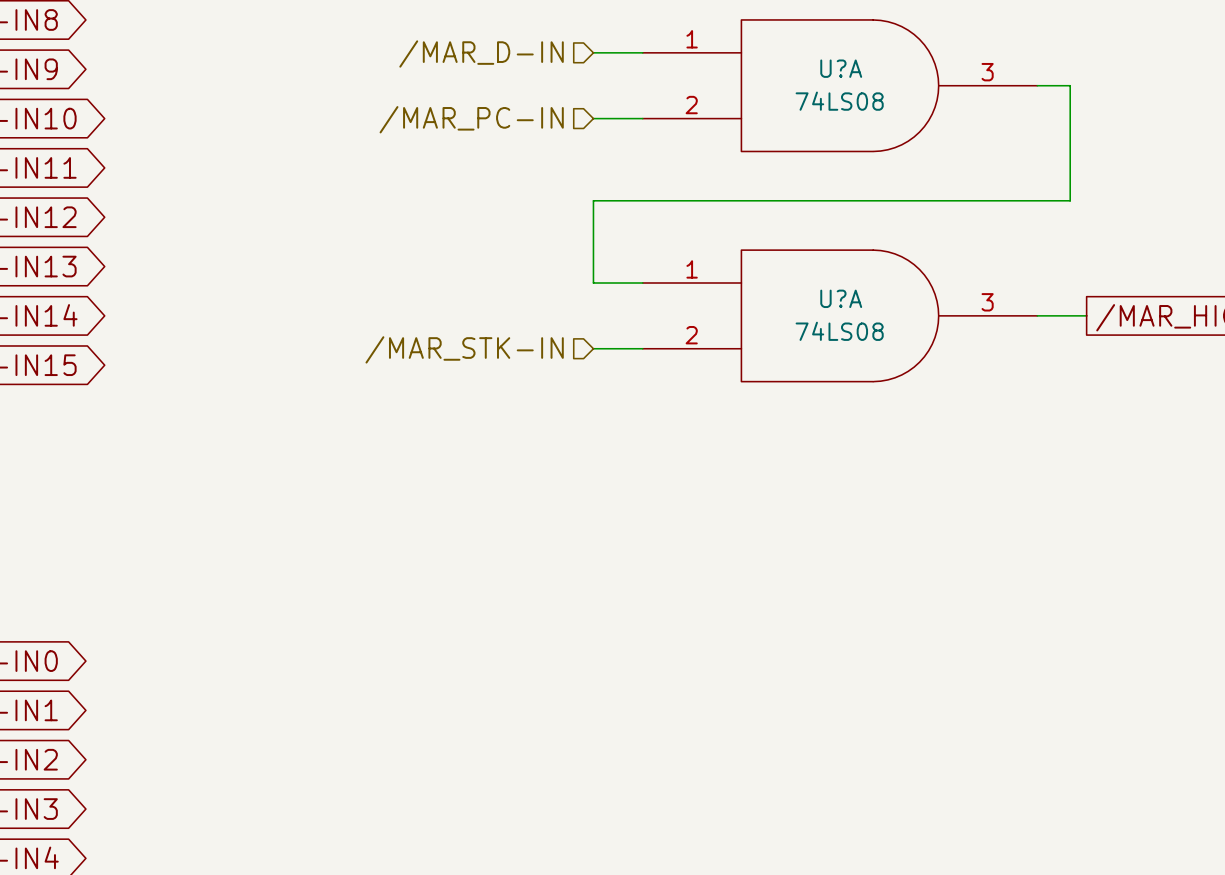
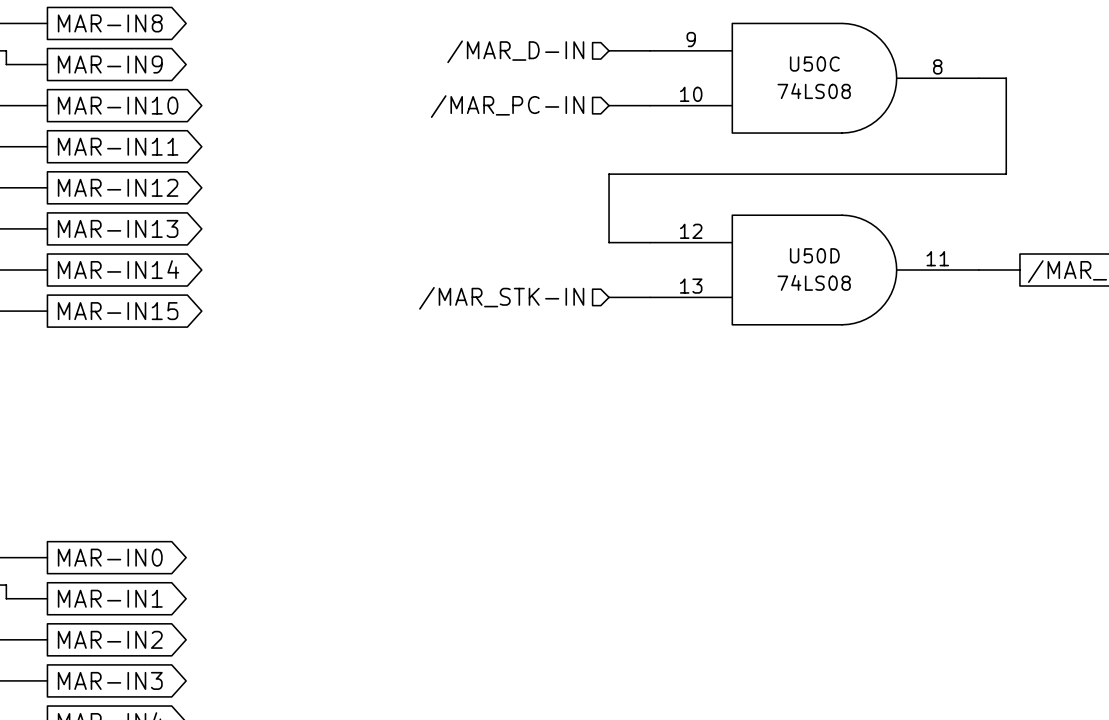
U?A pin number: 1 (692, 39) -> 9 (691, 39)
U?A name: U?A (841, 68) -> U50C (814, 64)
U?A pin number: 3 (987, 72) -> 8 (937, 66)
U?A pin number: 2 (691, 105) -> 10 (691, 94)
U?A pin number: 1 (692, 269) -> 12 (691, 231)
U?A name: U?A (841, 298) -> U50D (814, 255)
U?A pin number: 3 (987, 302) -> 11 (937, 258)
U?A pin number: 2 (691, 335) -> 13 (691, 286)

